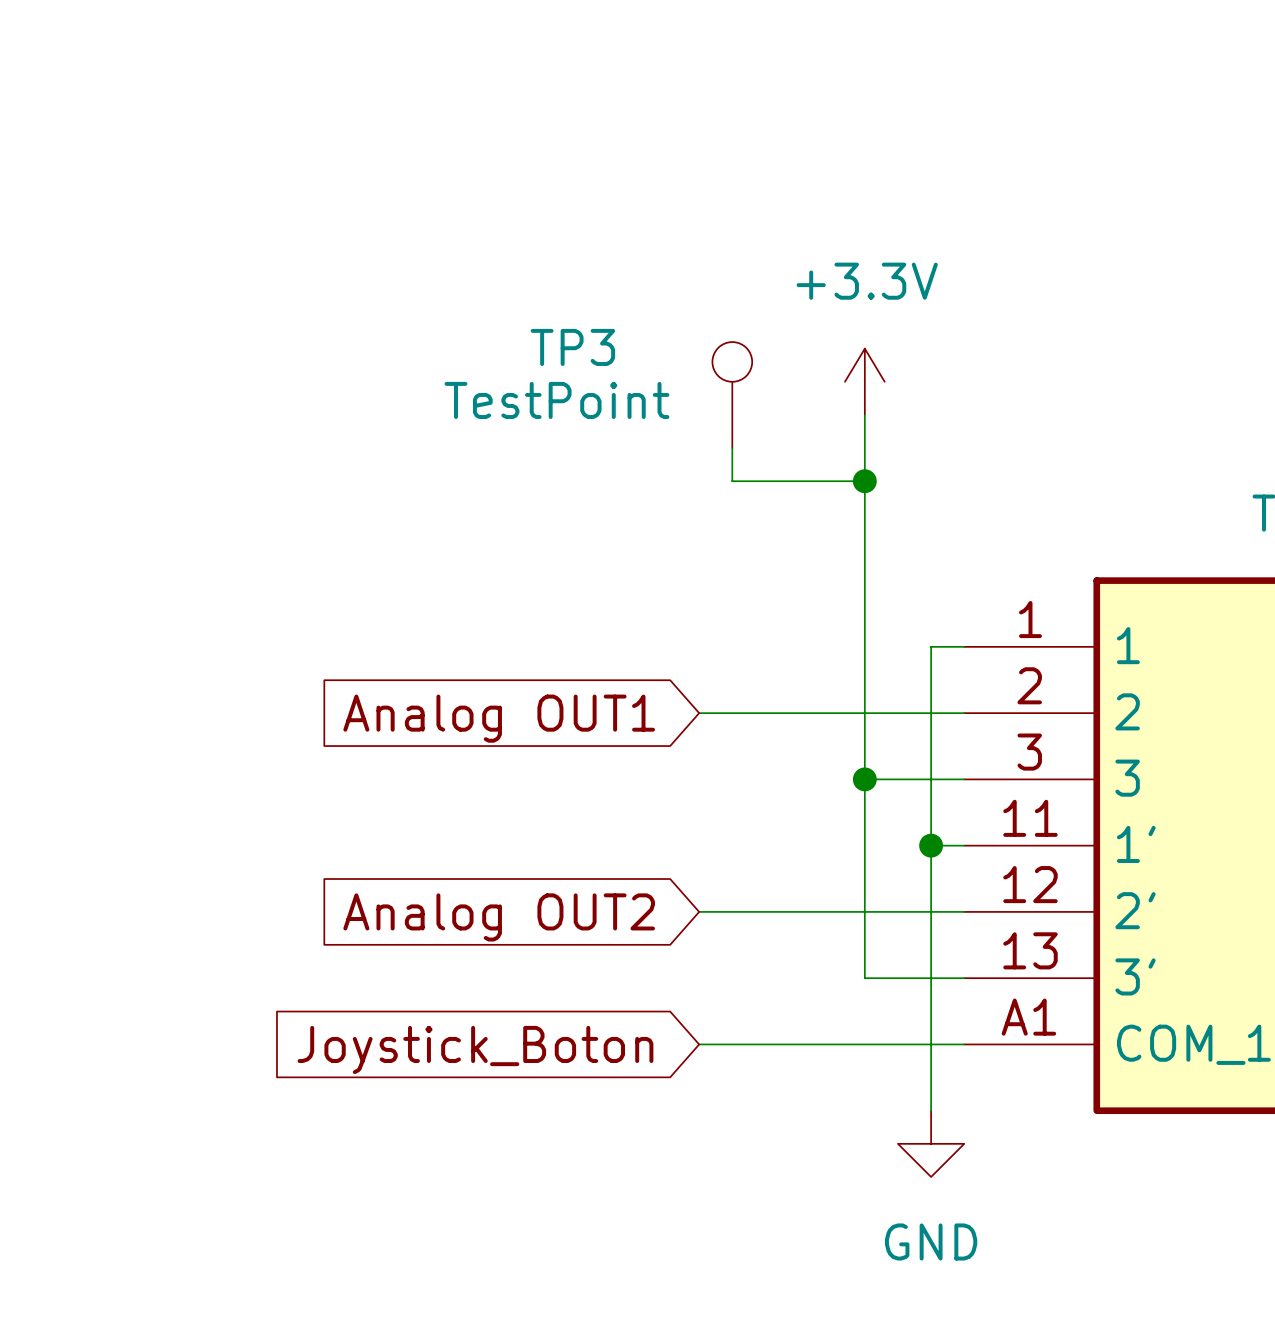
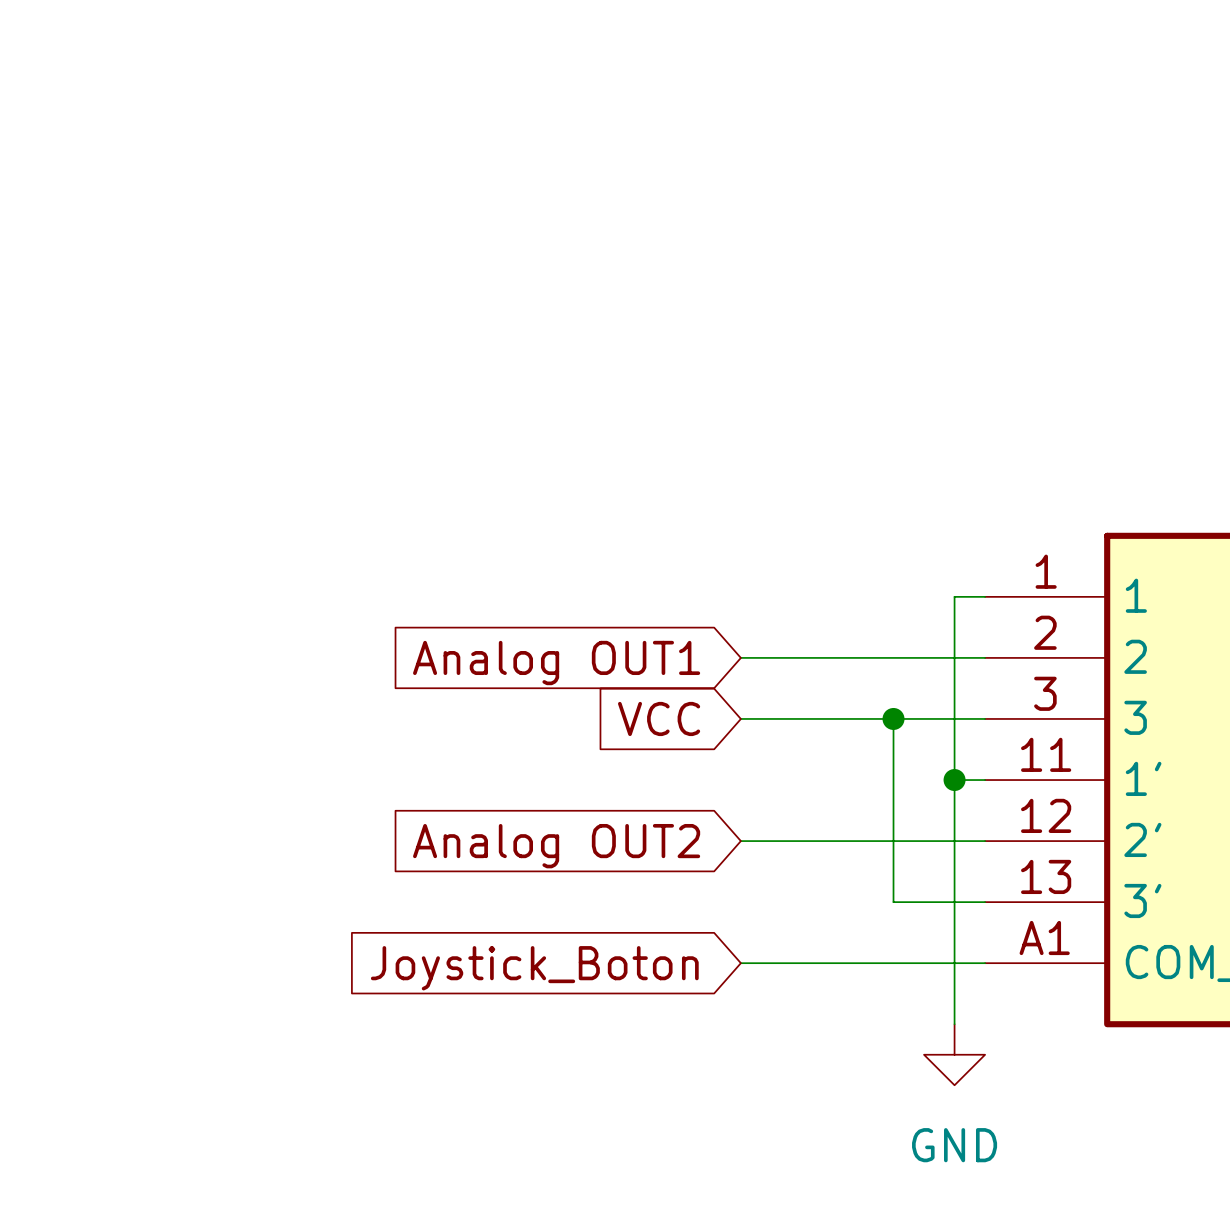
power symbol: +3.3V (864, 381) -> none
TP3: TestPoint (732, 395) -> none
wire: (864, 414) (864, 779) -> (740, 718) (893, 718)
wire: (732, 448) (732, 481) (864, 481) -> none
junction: (864, 481) -> none
global label: none -> VCC (659, 718)

